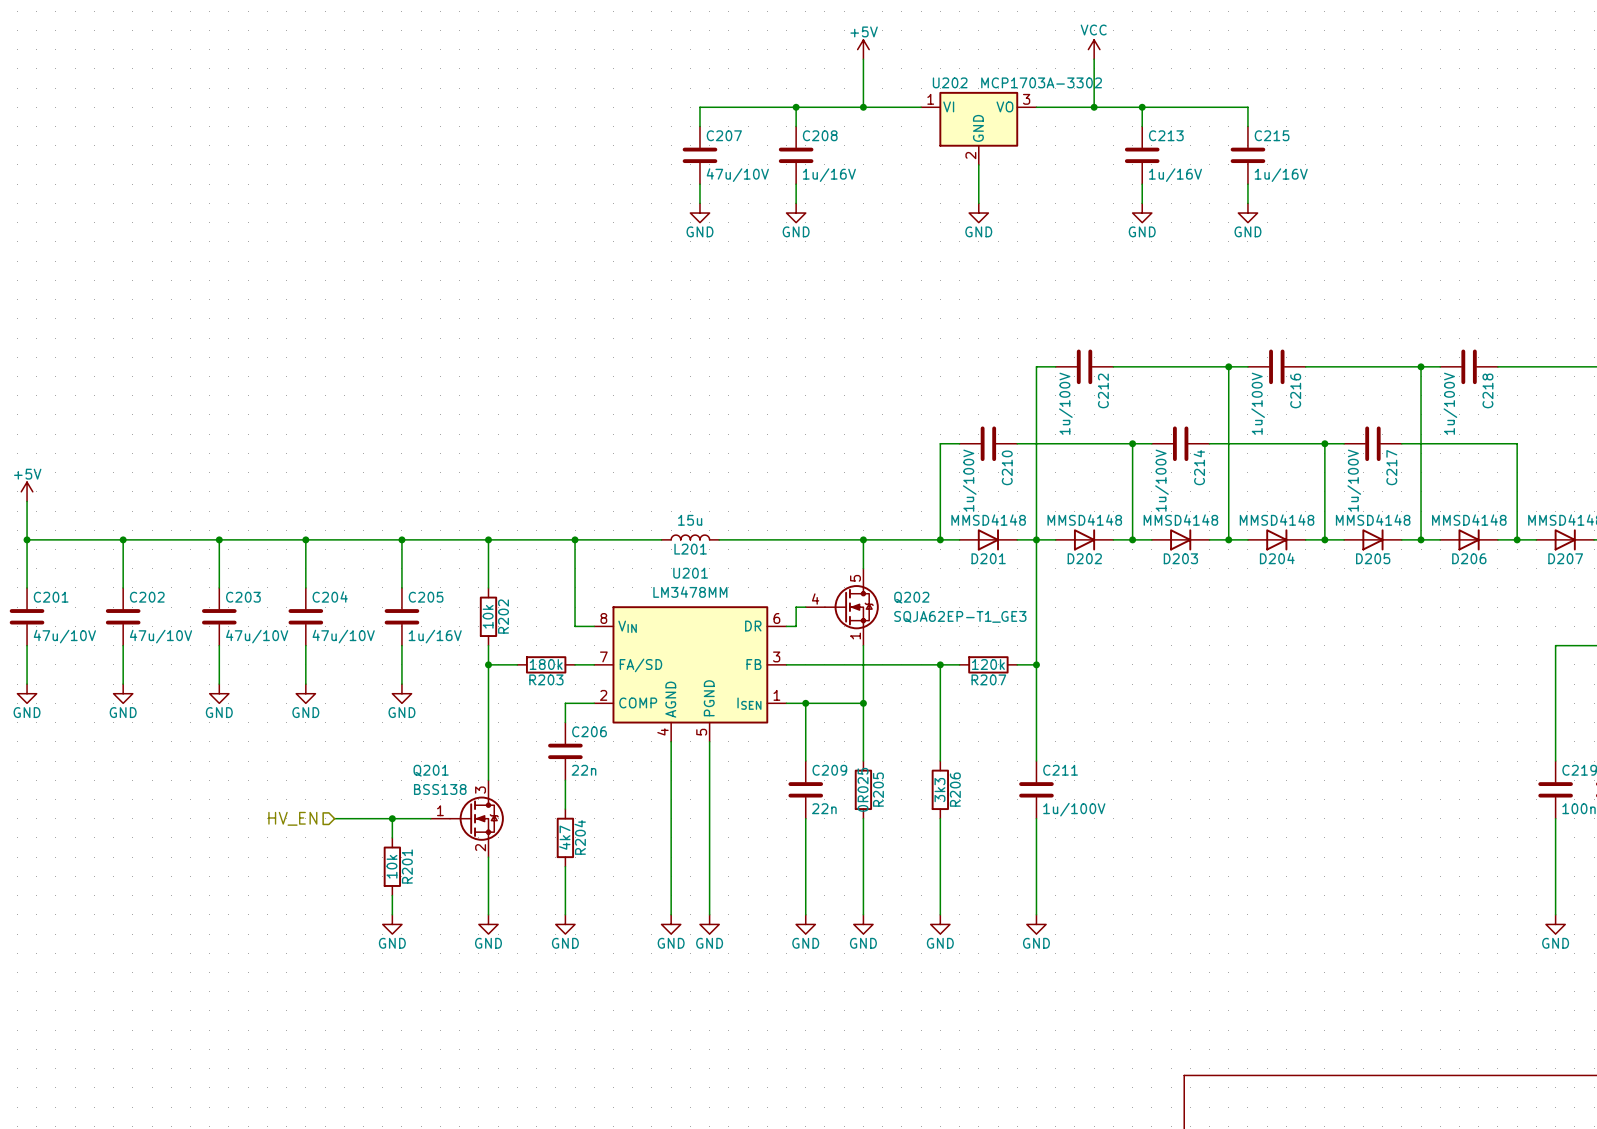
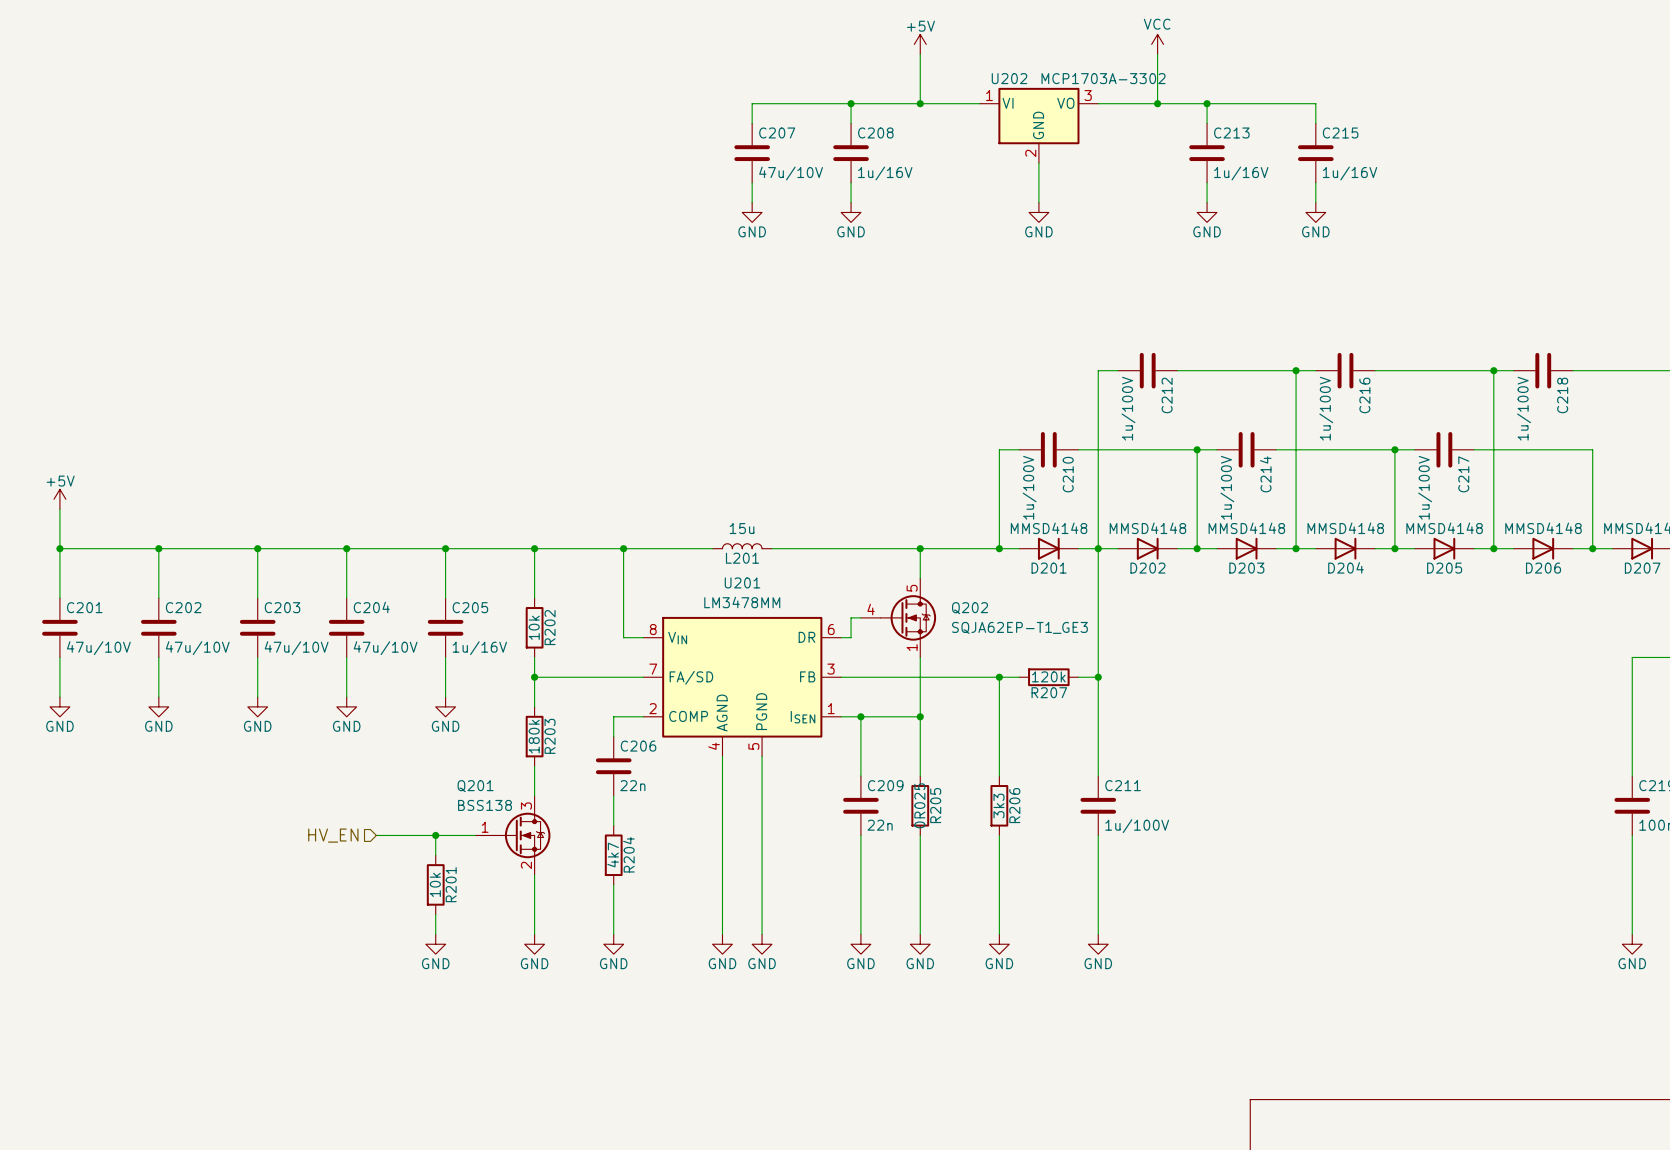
R203 rotation: 0° (546, 664) -> 90° clockwise (534, 736)
R203 position: (546, 664) -> (534, 736)
R203 name position: R203 (546, 679) -> R203 (550, 736)

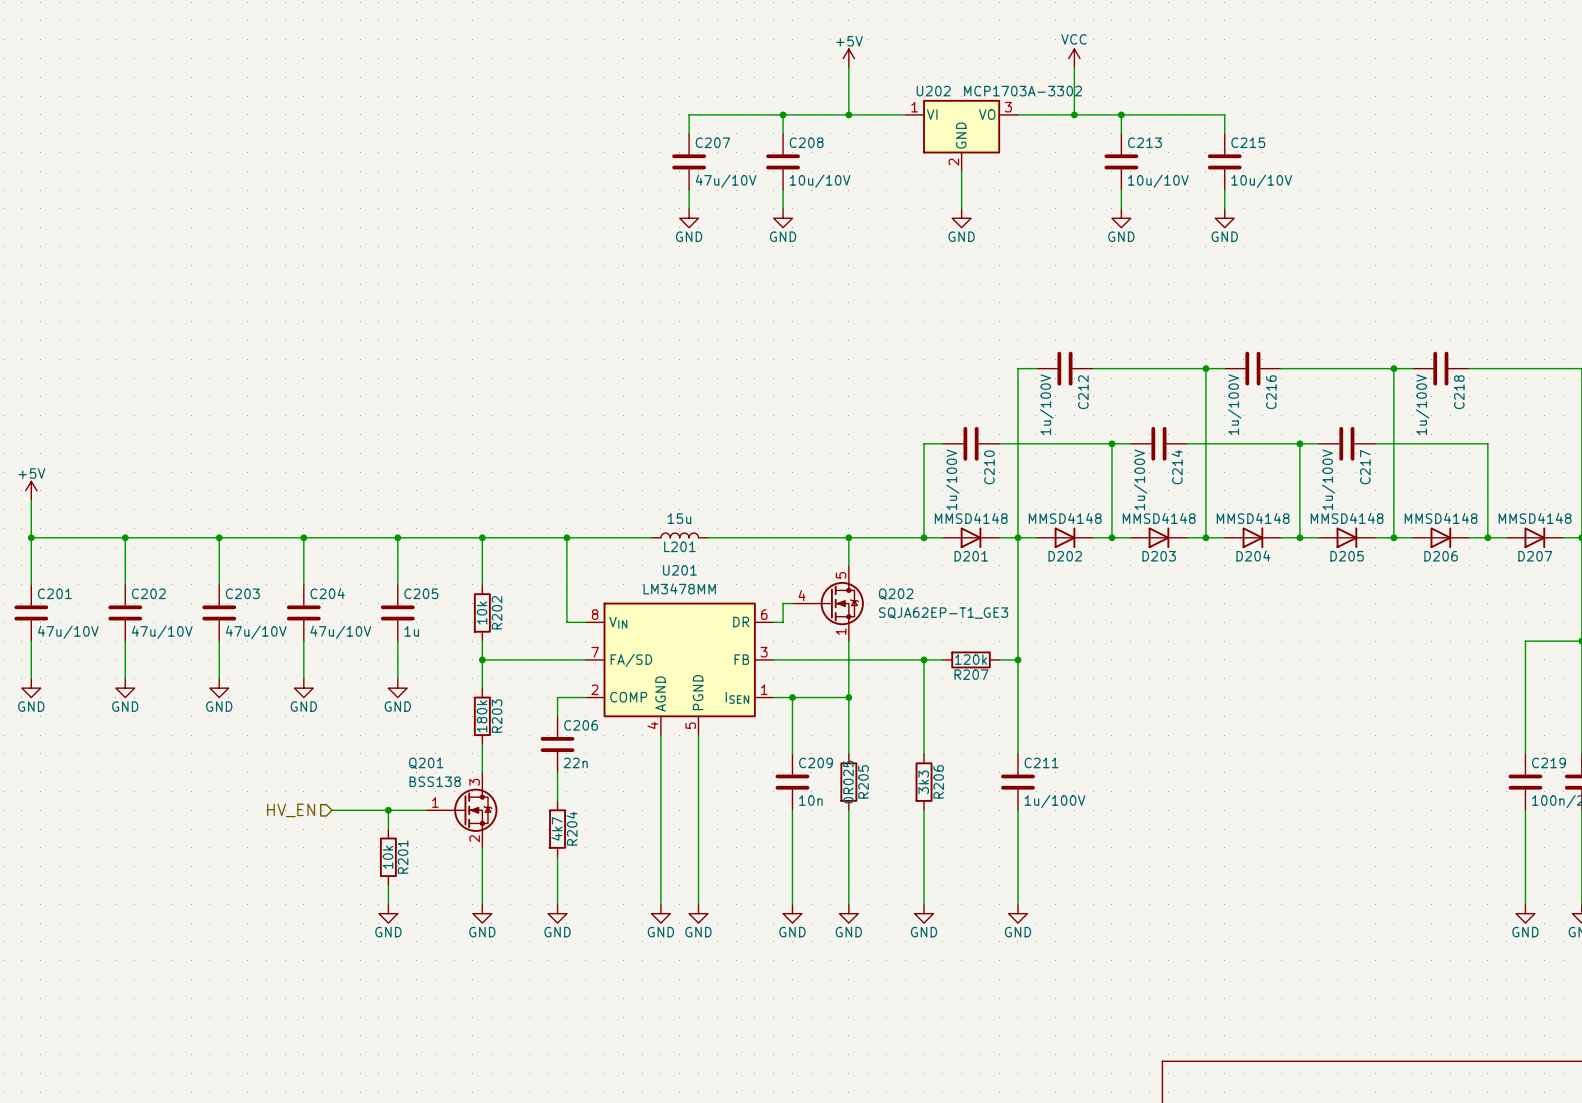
C208 value: 1u/16V (885, 173) -> 10u/10V (820, 181)
C213 value: 1u/16V (1241, 173) -> 10u/10V (1158, 181)
C215 value: 1u/16V (1350, 173) -> 10u/10V (1261, 181)
C205 value: 1u/16V (479, 648) -> 1u (411, 631)
C209 value: 22n (880, 825) -> 10n (810, 800)

